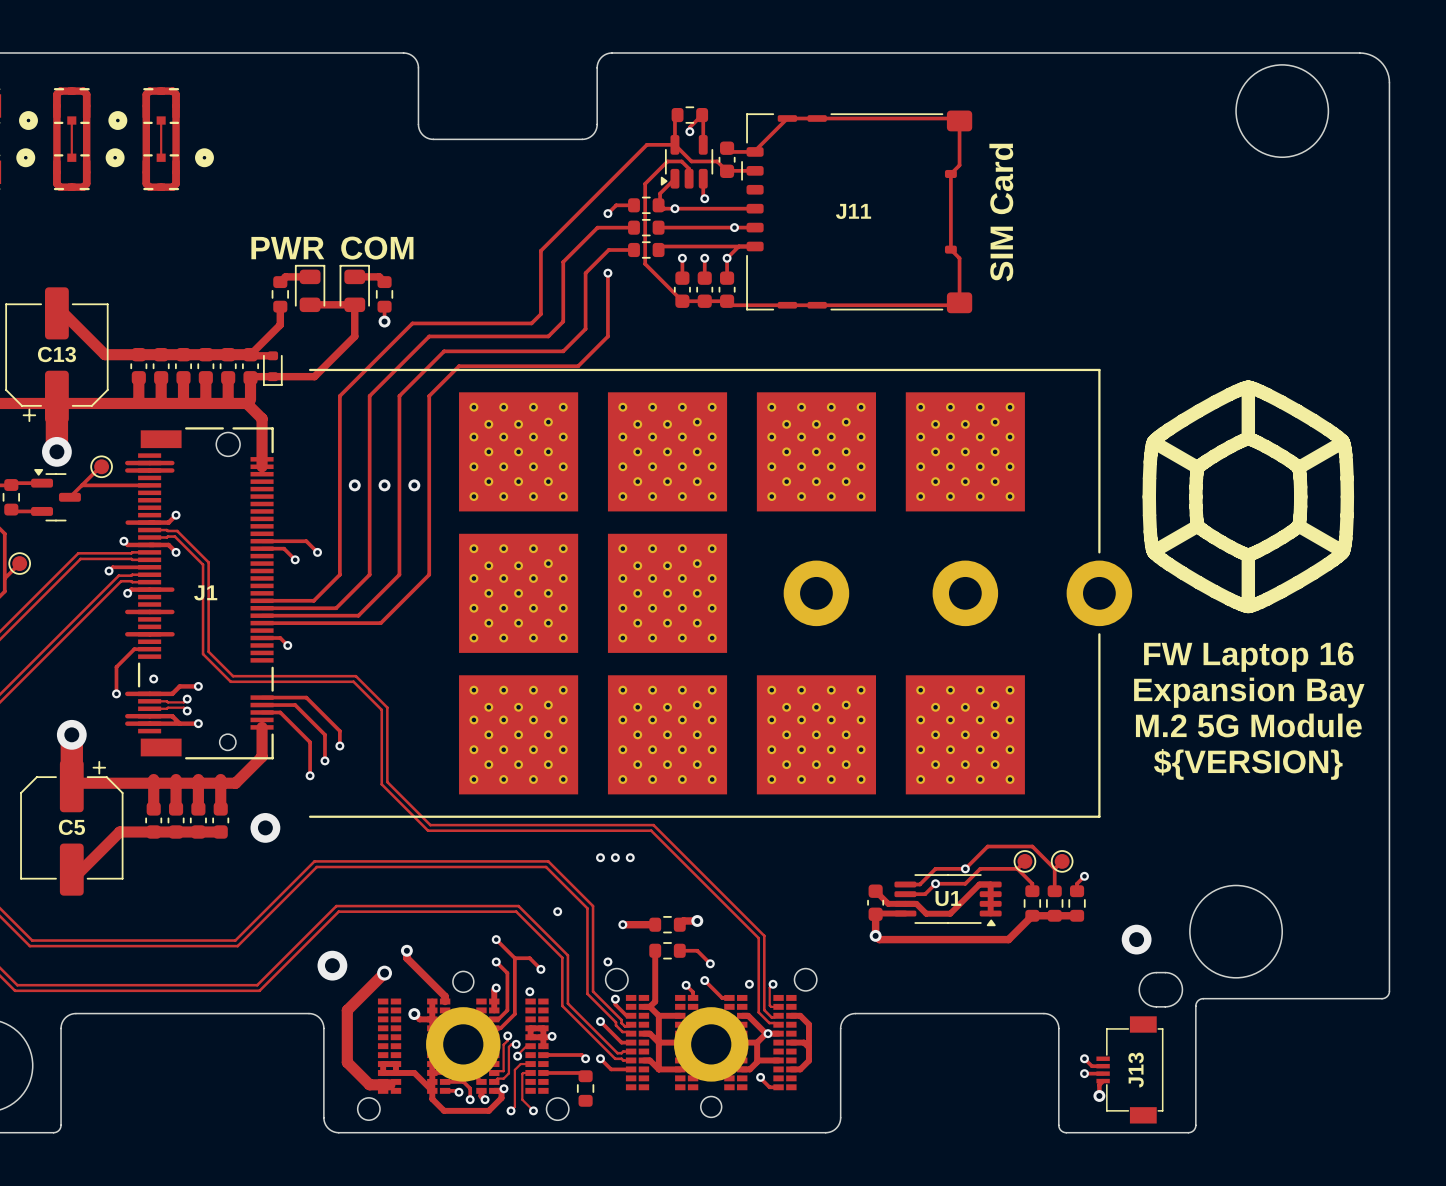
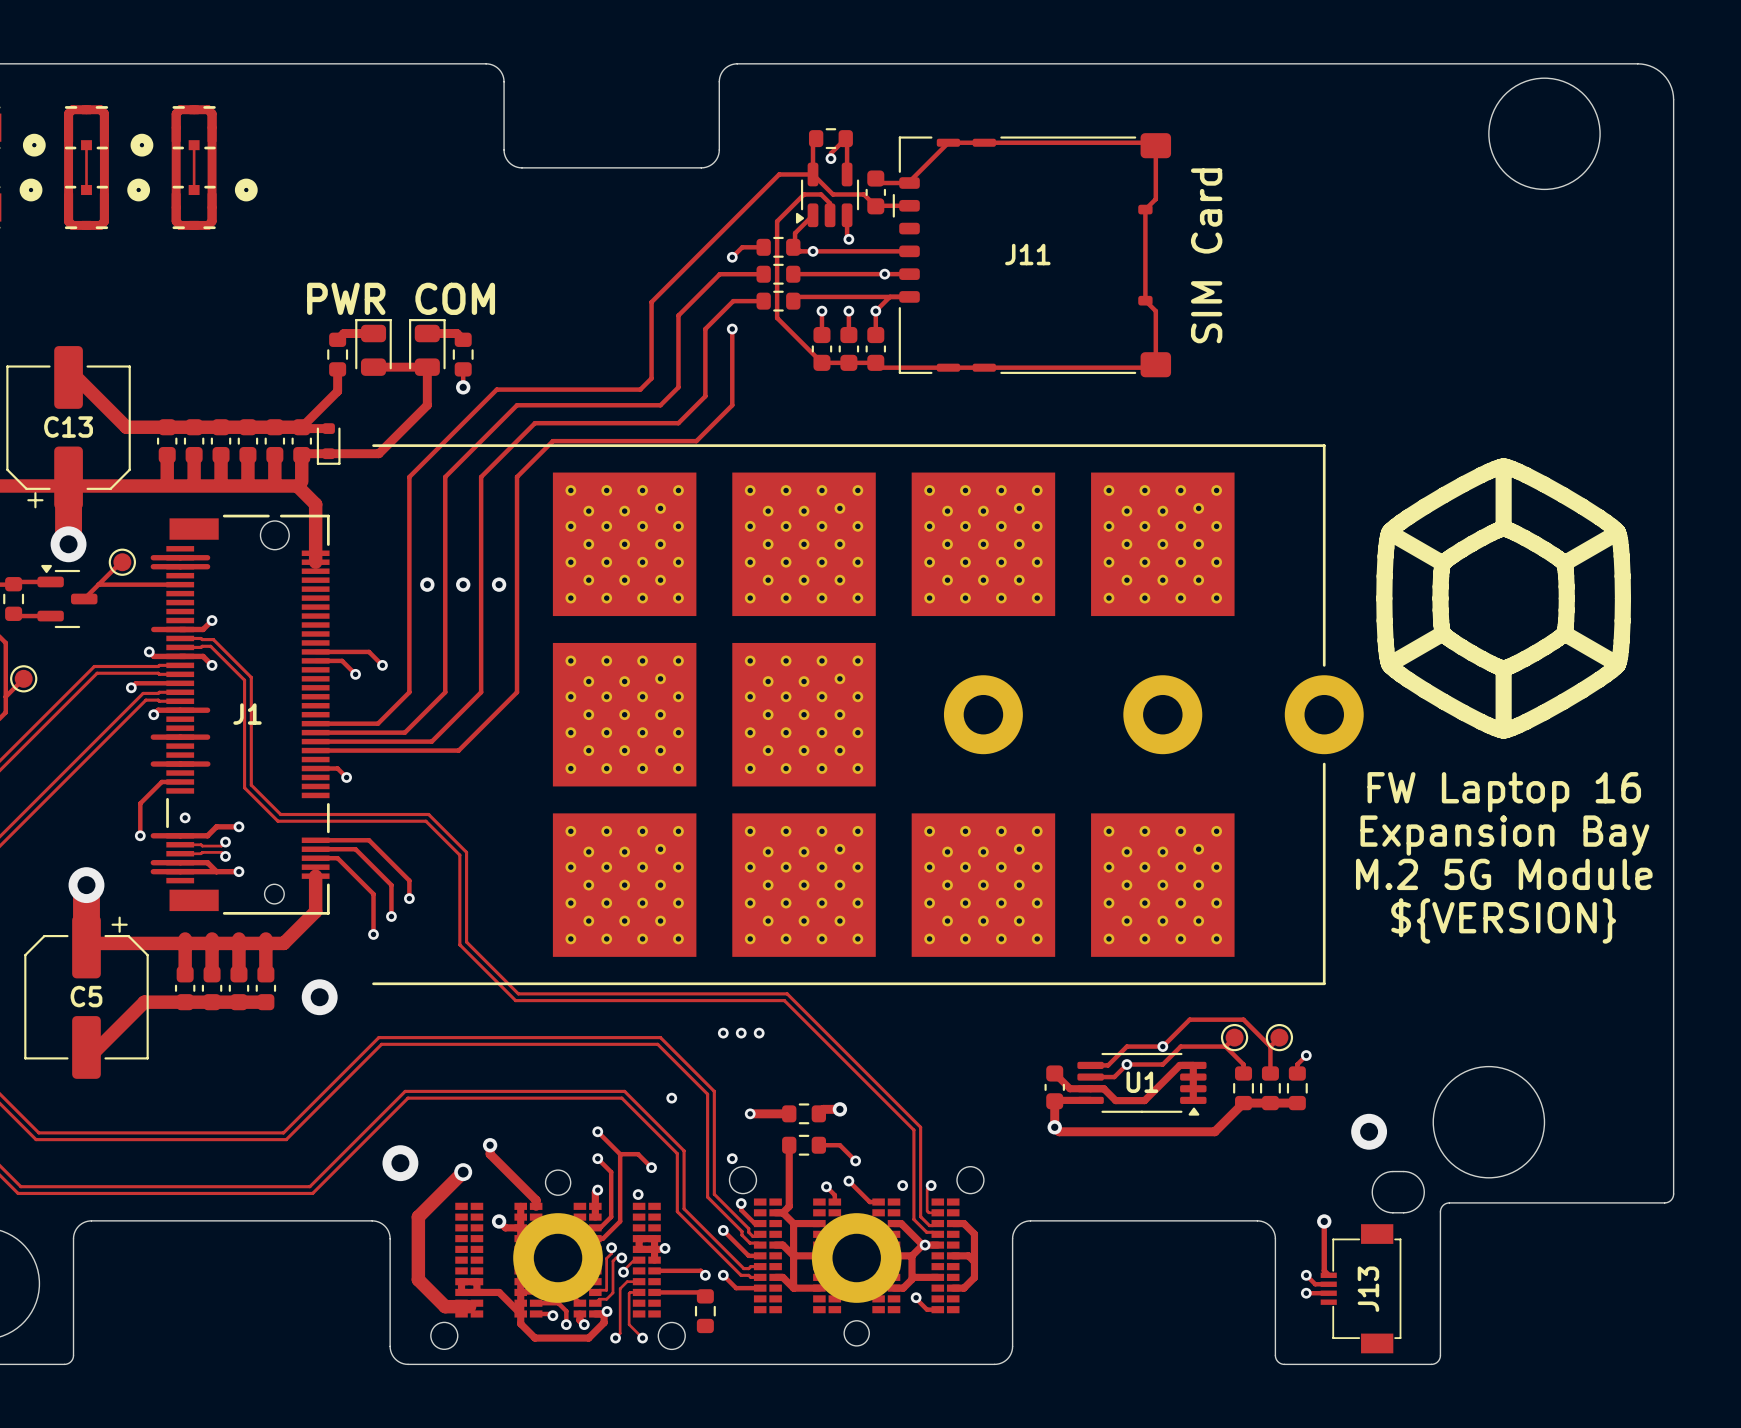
track: none -> (1324, 1221) (1324, 1270) (1328, 1275)
track: (1103, 1081) (1099, 1084) (1099, 1095) -> none
via position: (1099, 1095) -> (1324, 1221)

